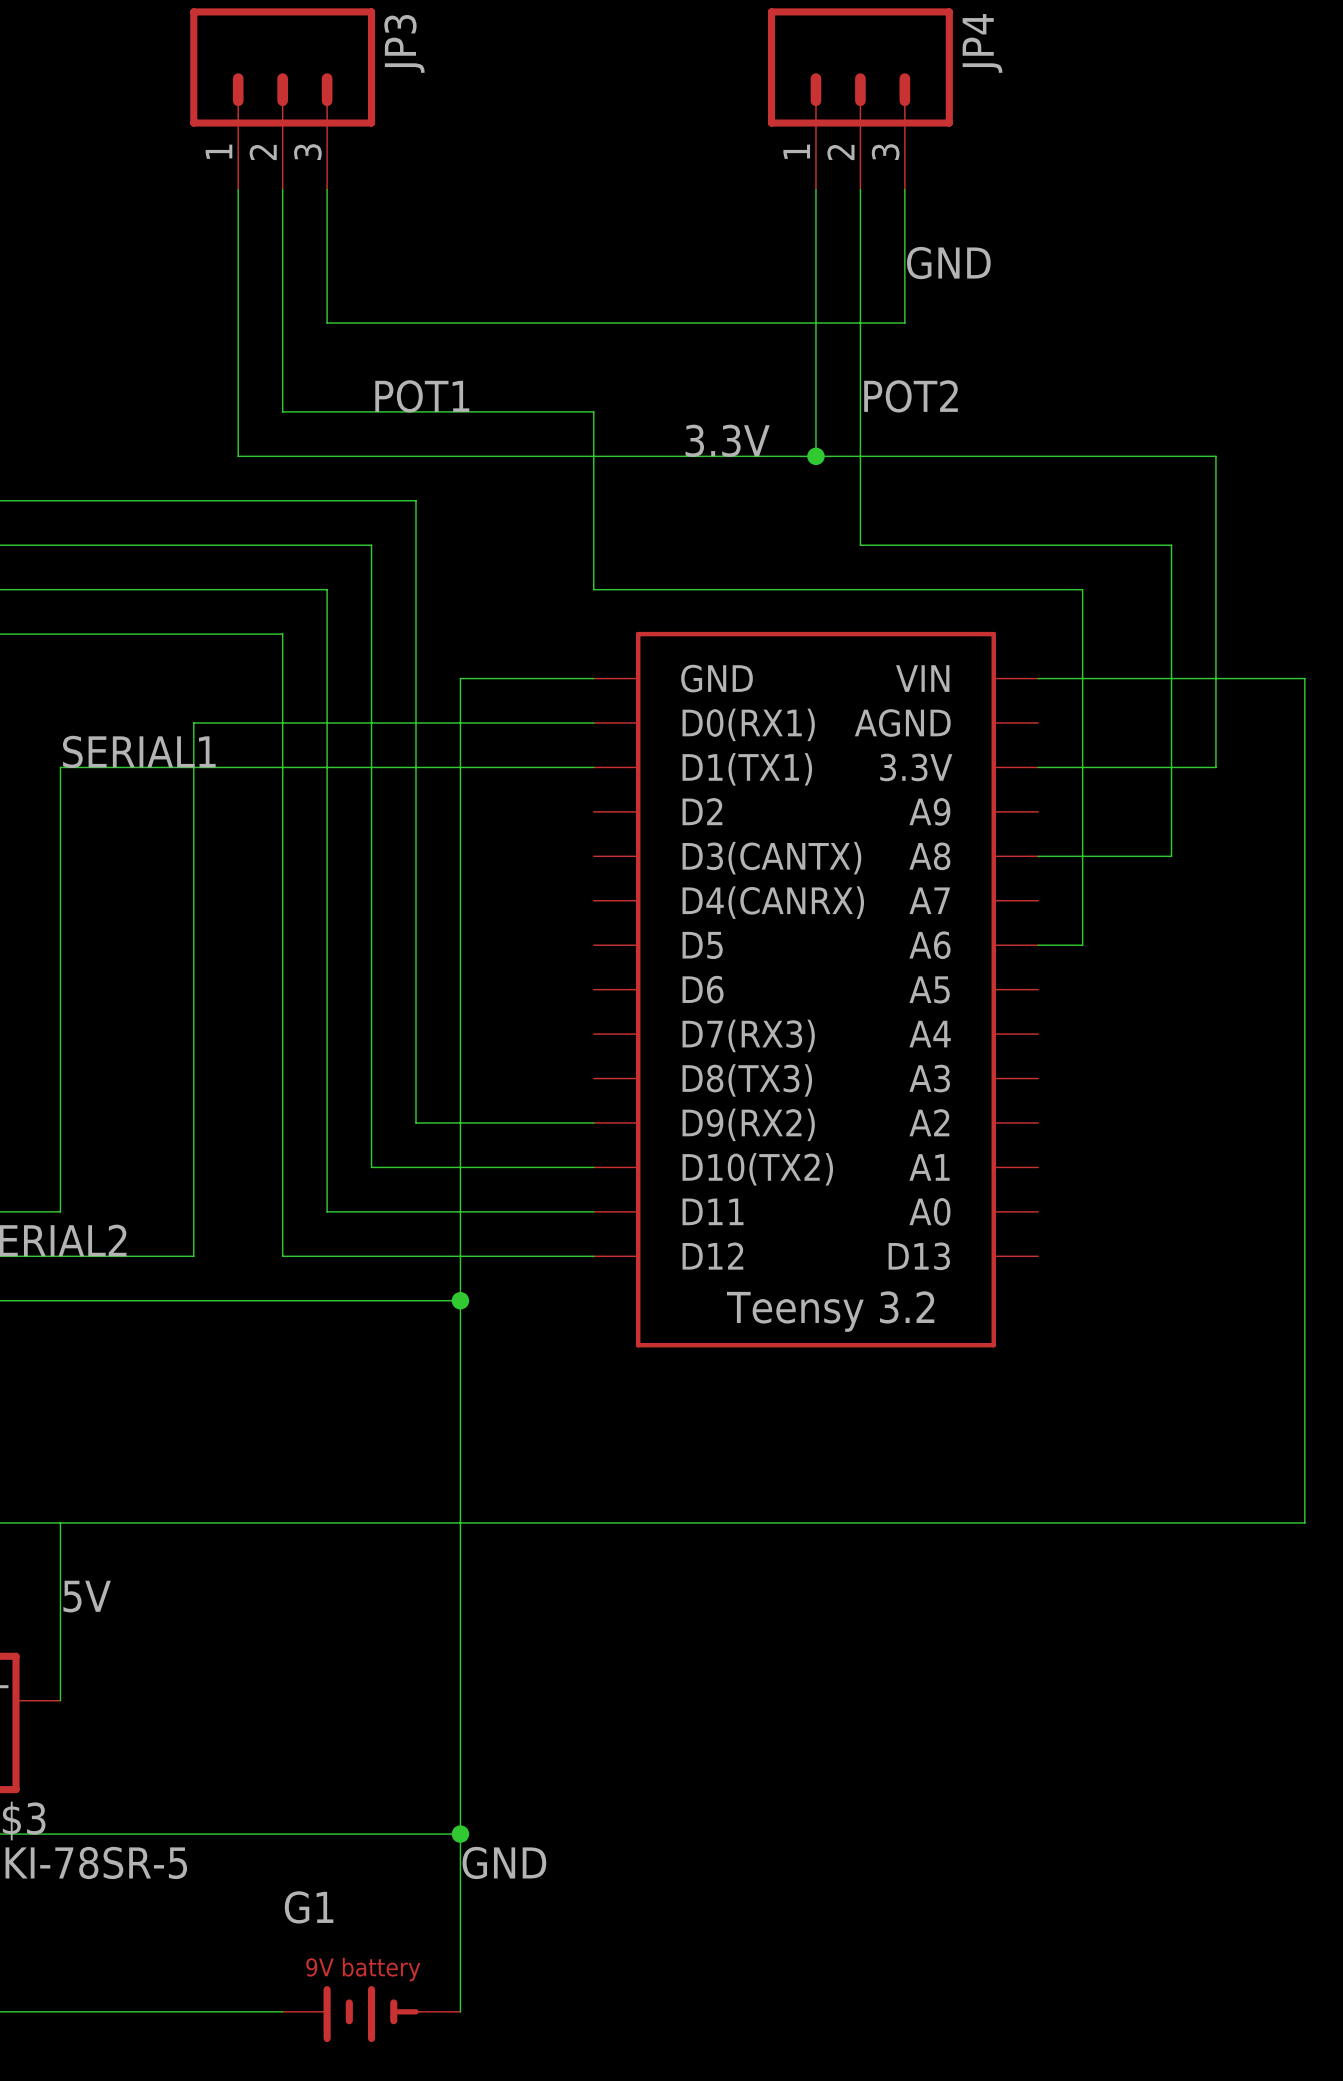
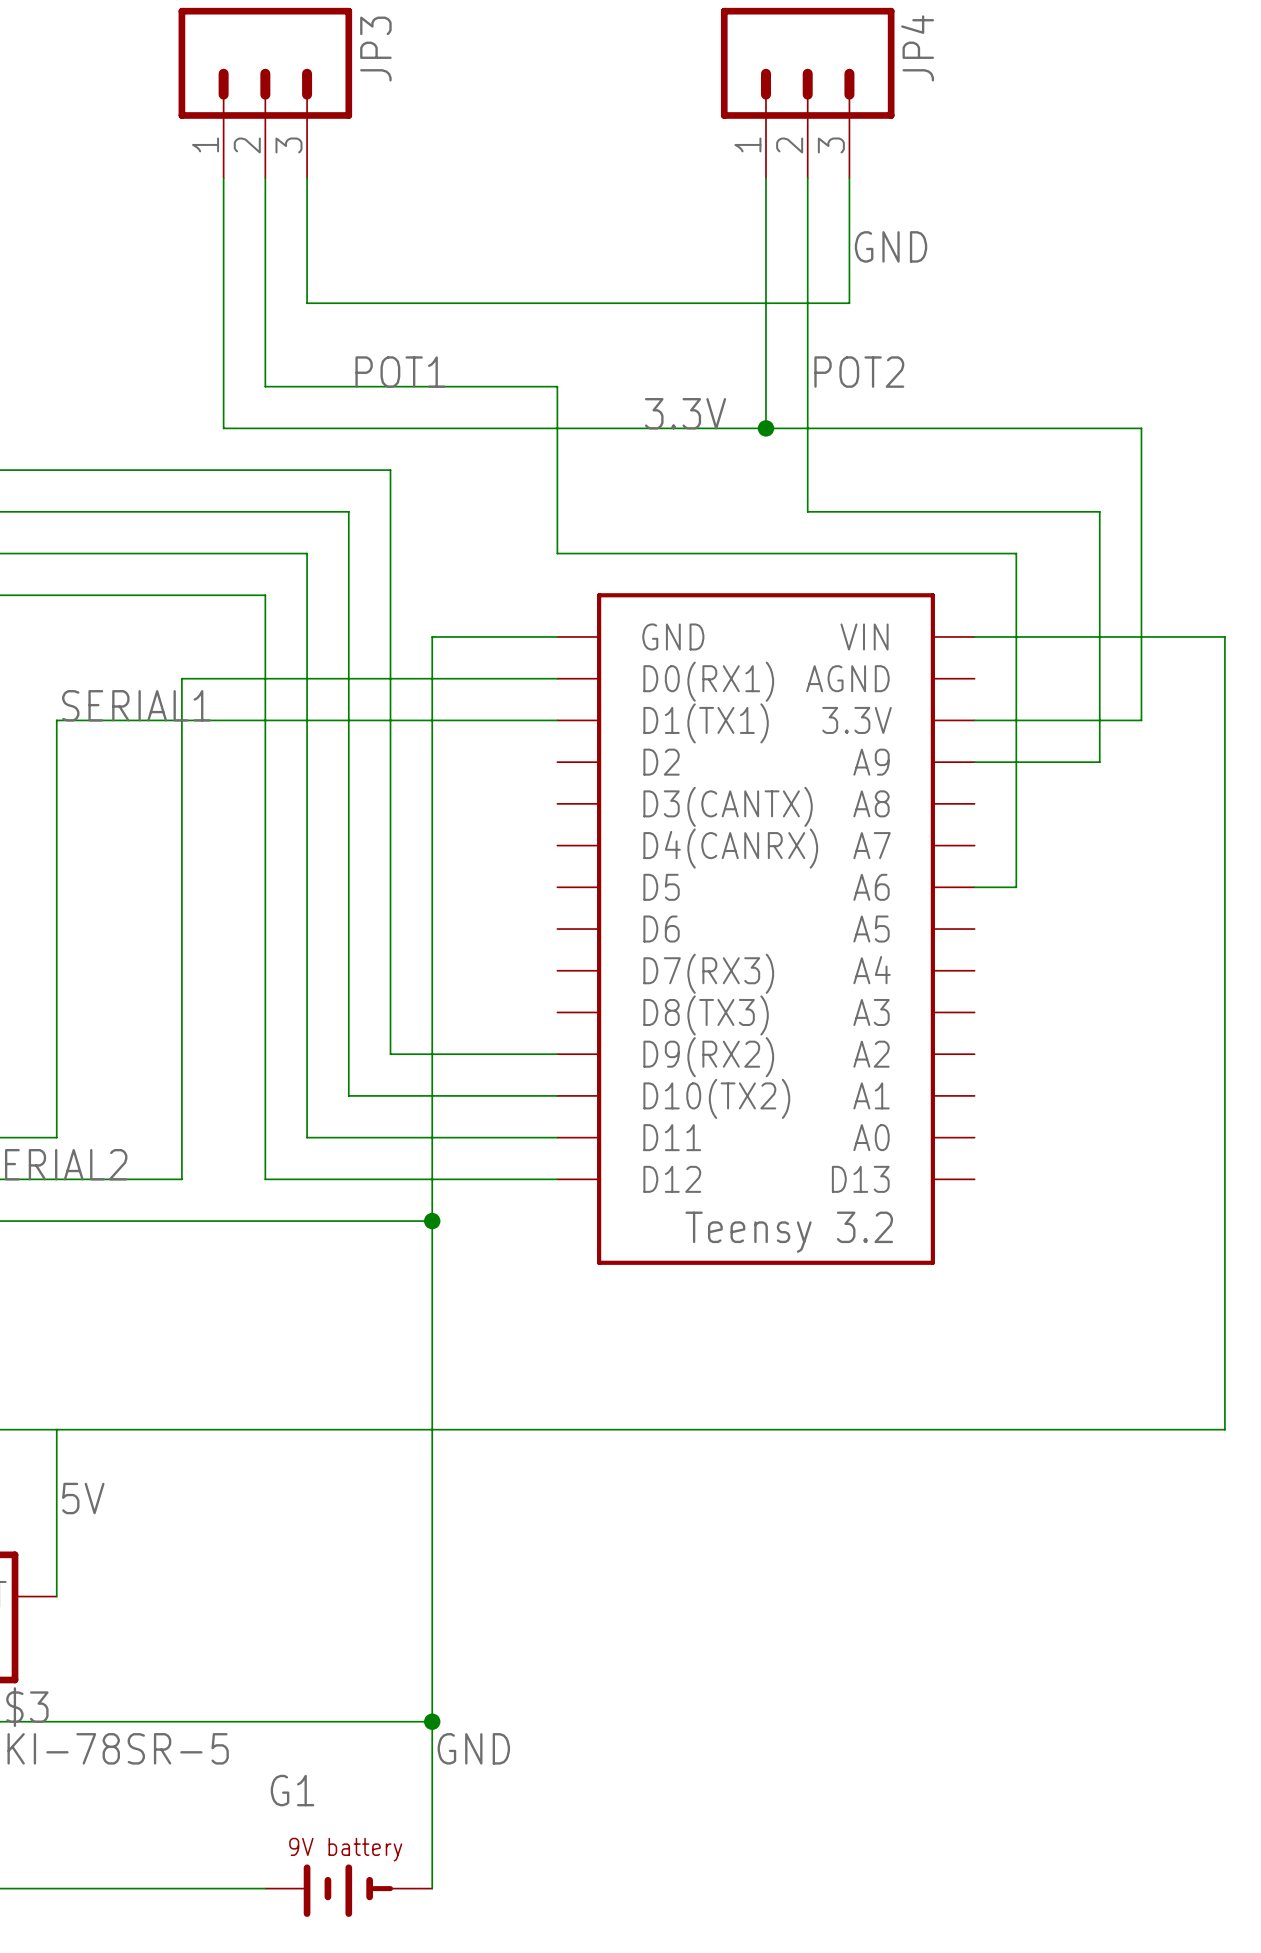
wire: (1171, 811) (1171, 856) (1038, 856) -> (1099, 762) (974, 762)

